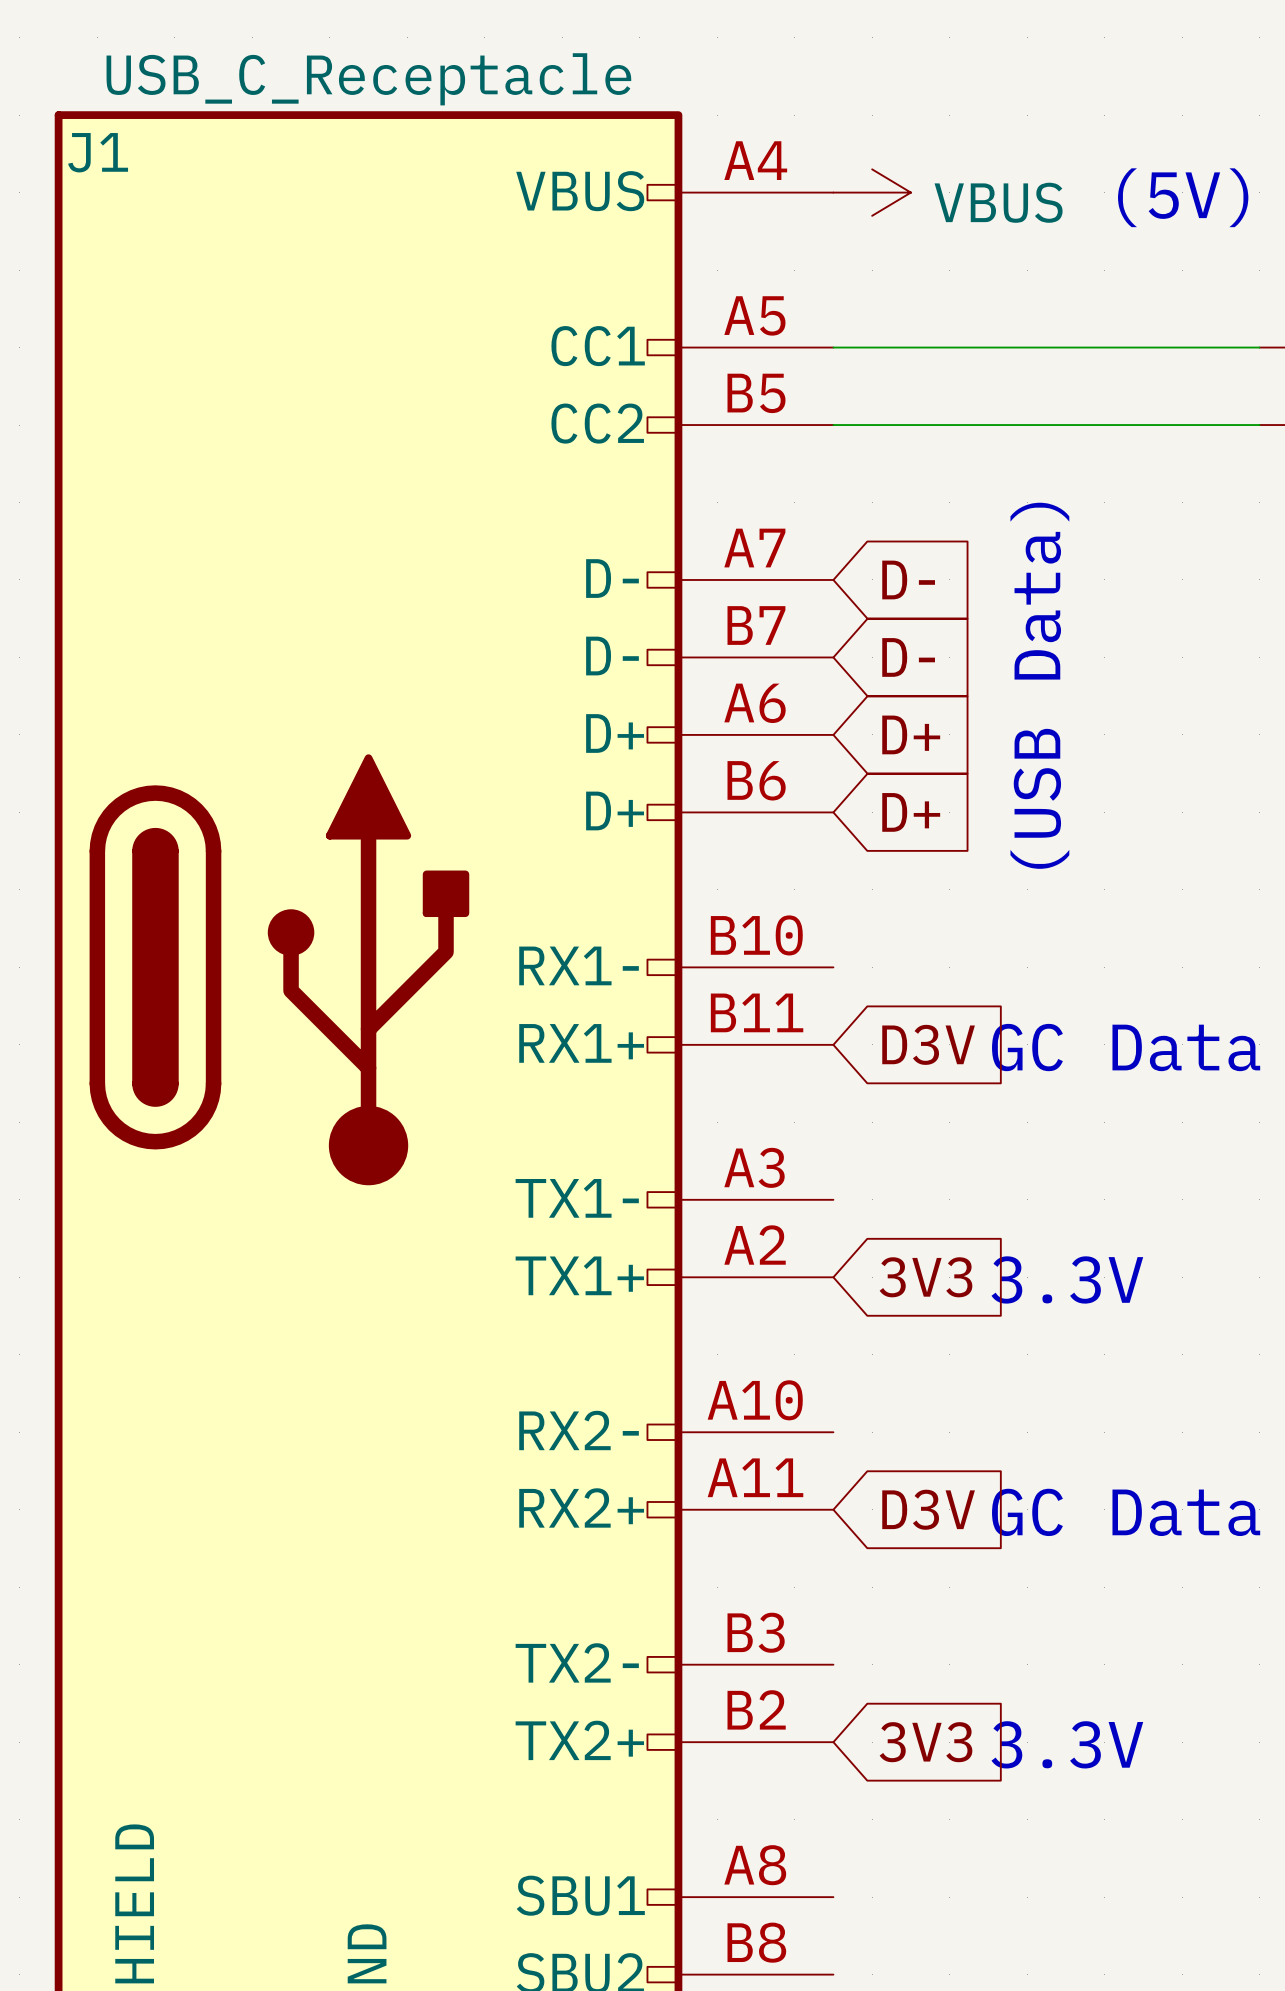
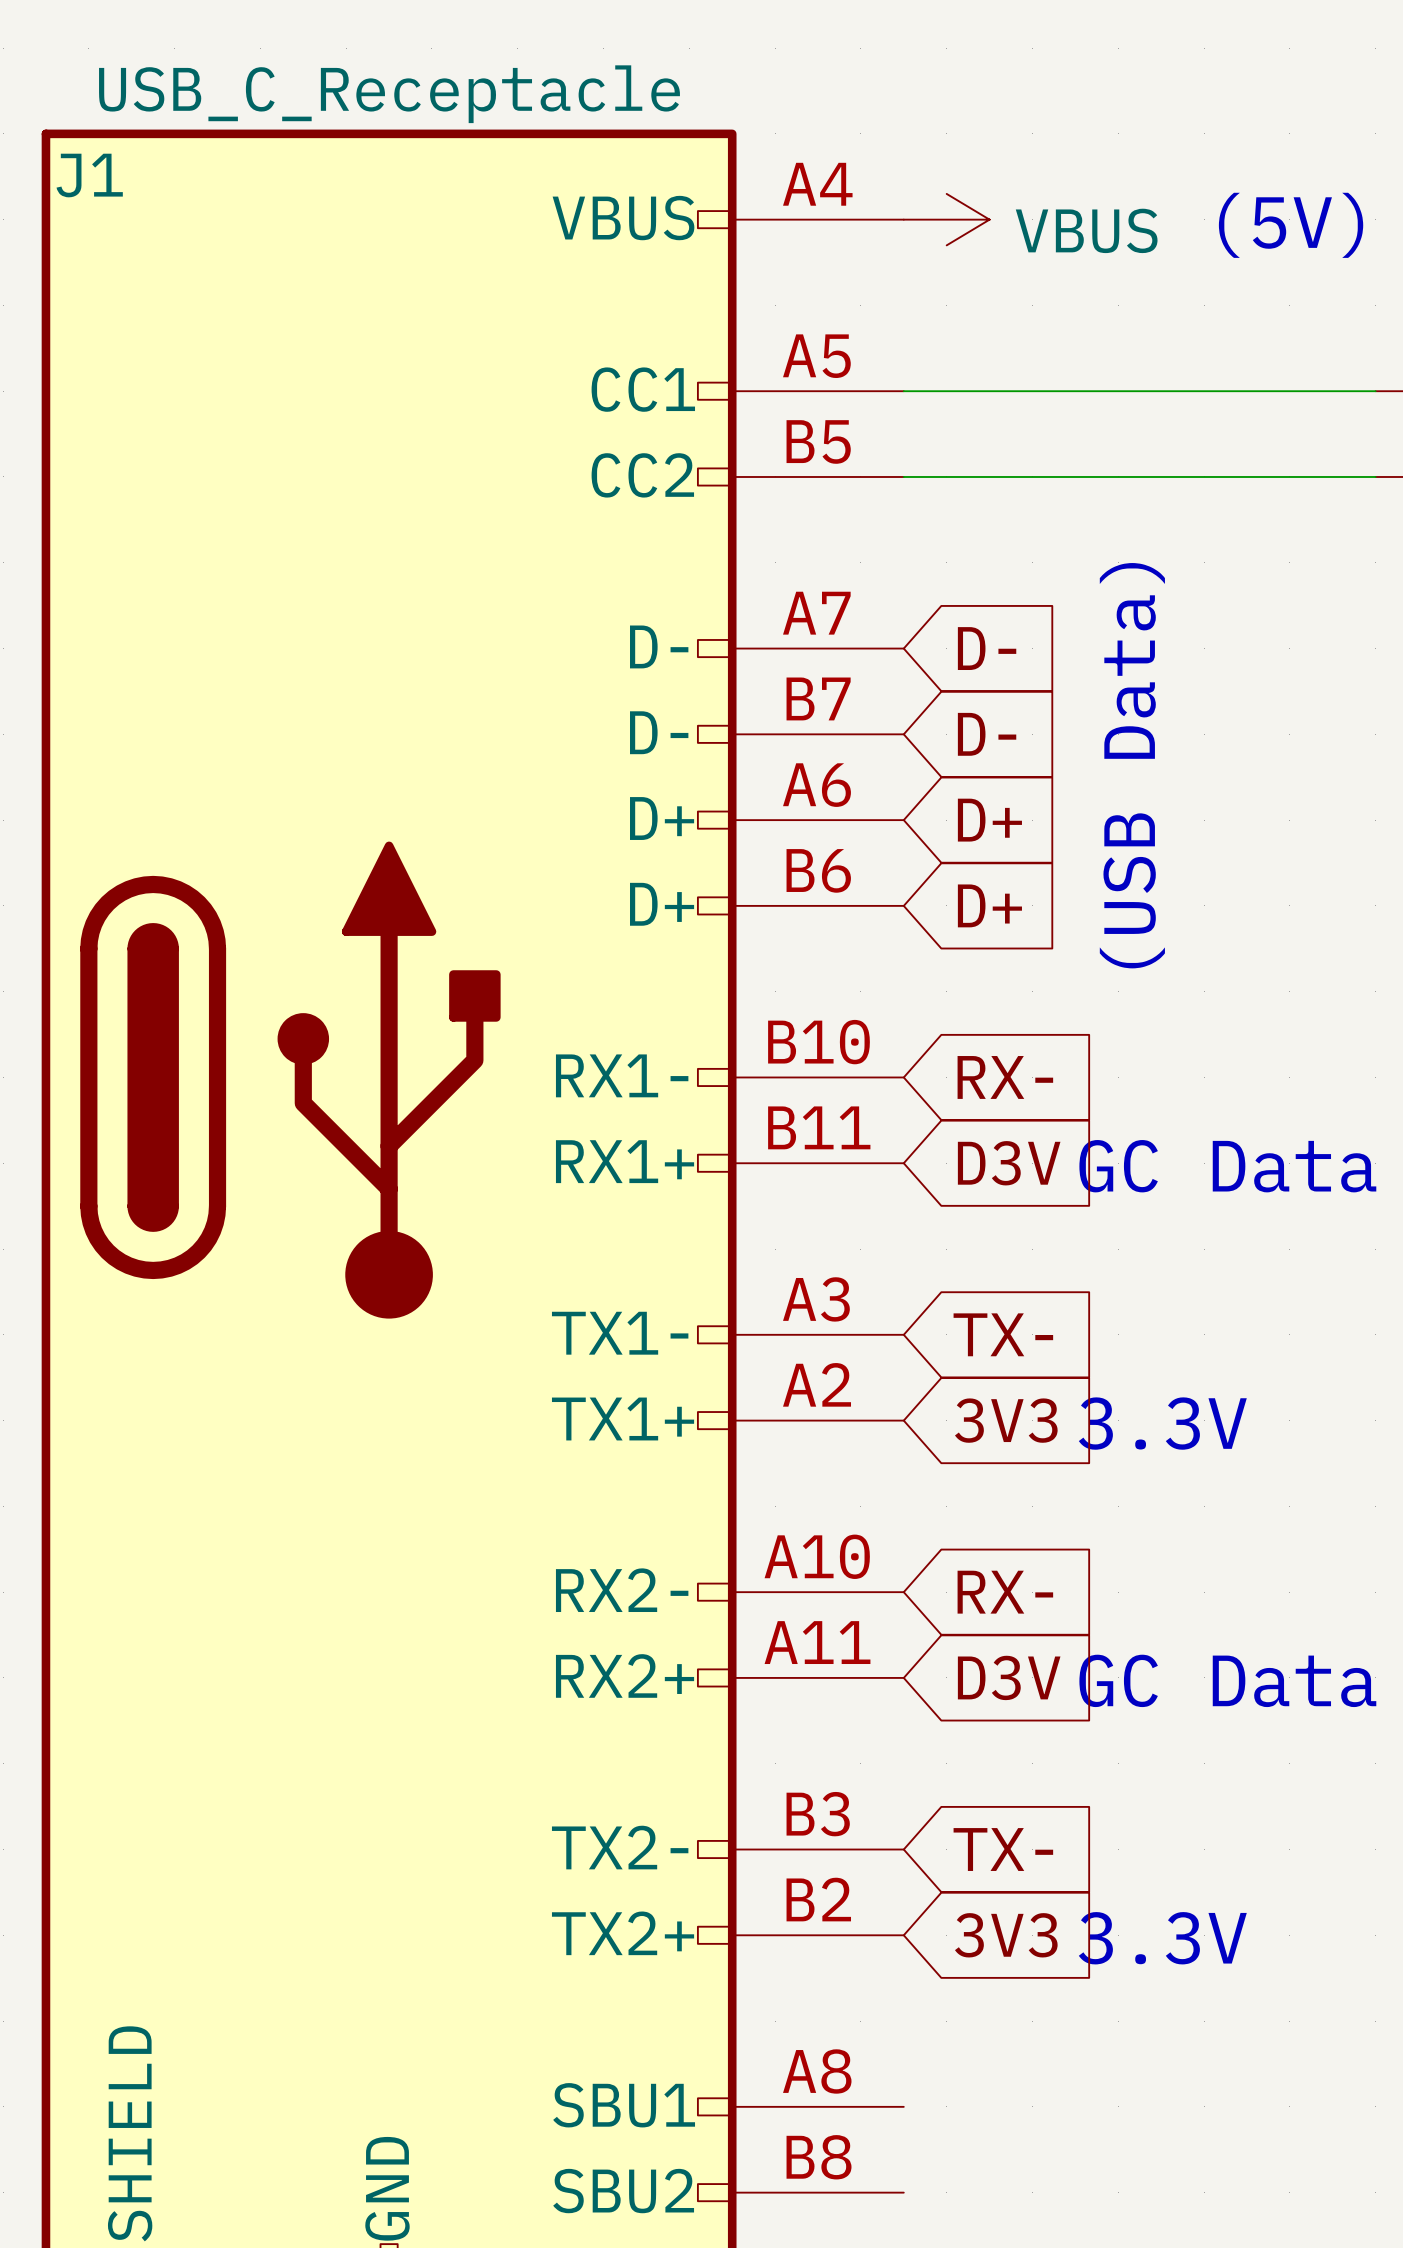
global label: none -> RX- (1005, 1077)
global label: none -> TX- (1003, 1334)
global label: none -> RX- (1005, 1592)
global label: none -> TX- (1003, 1849)

